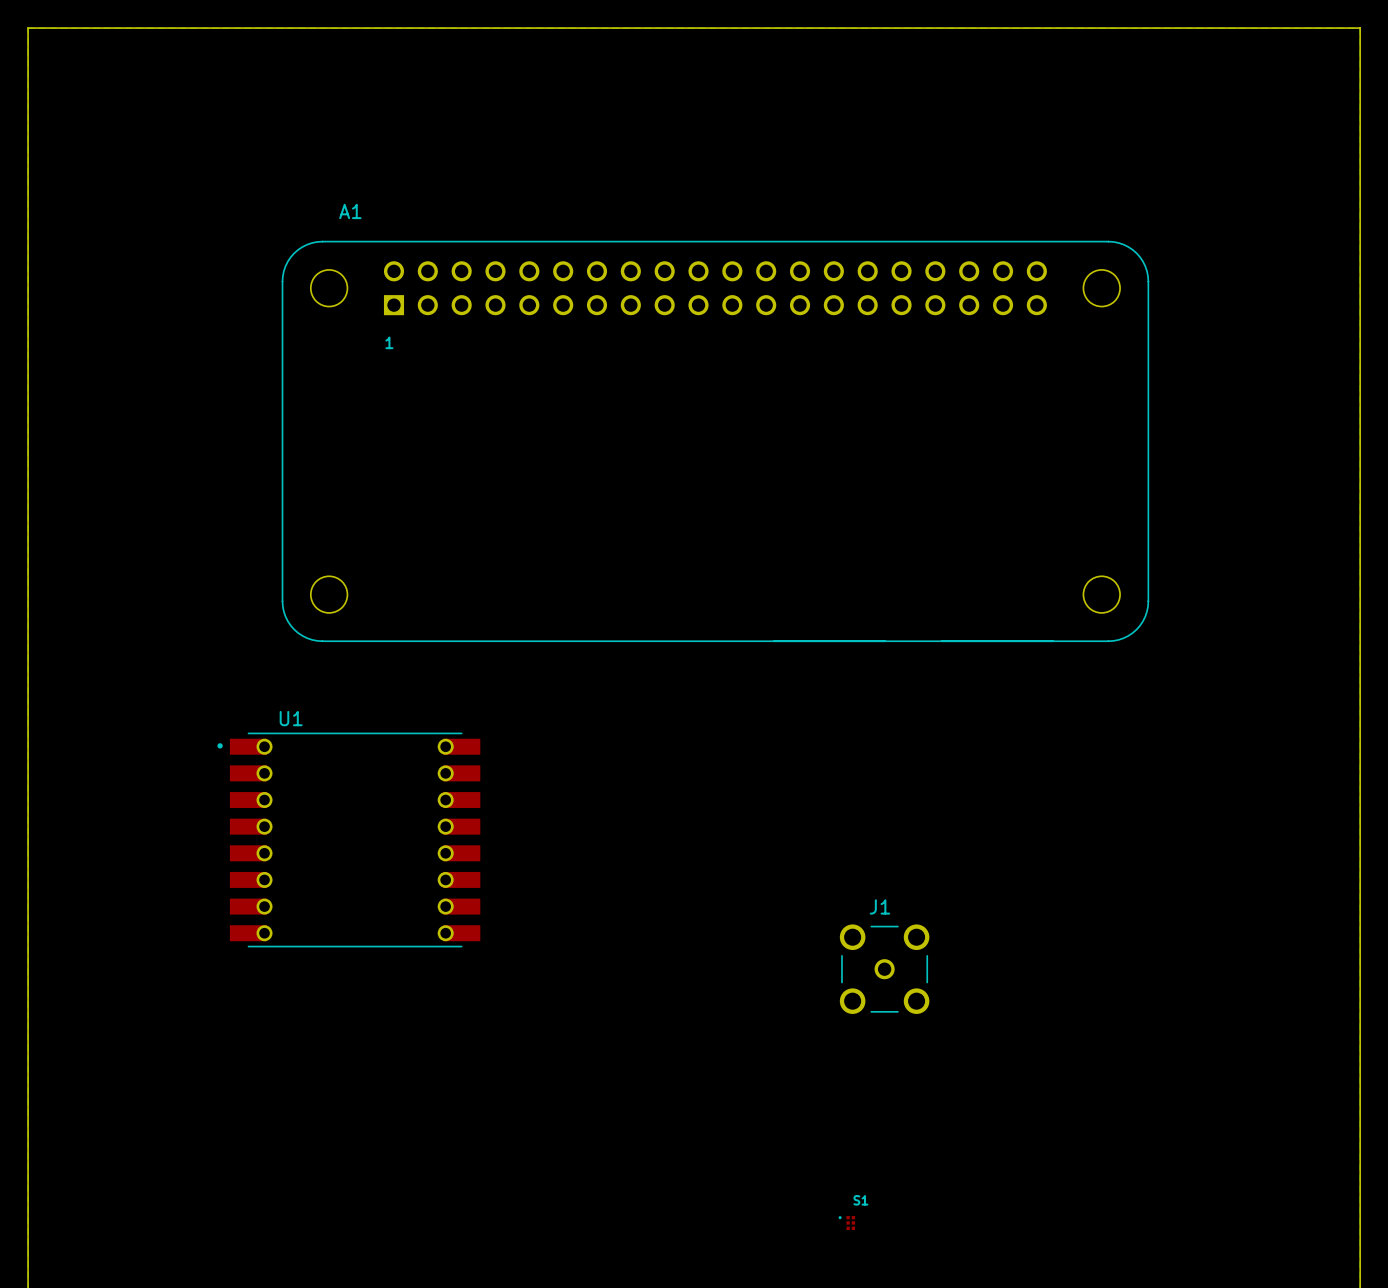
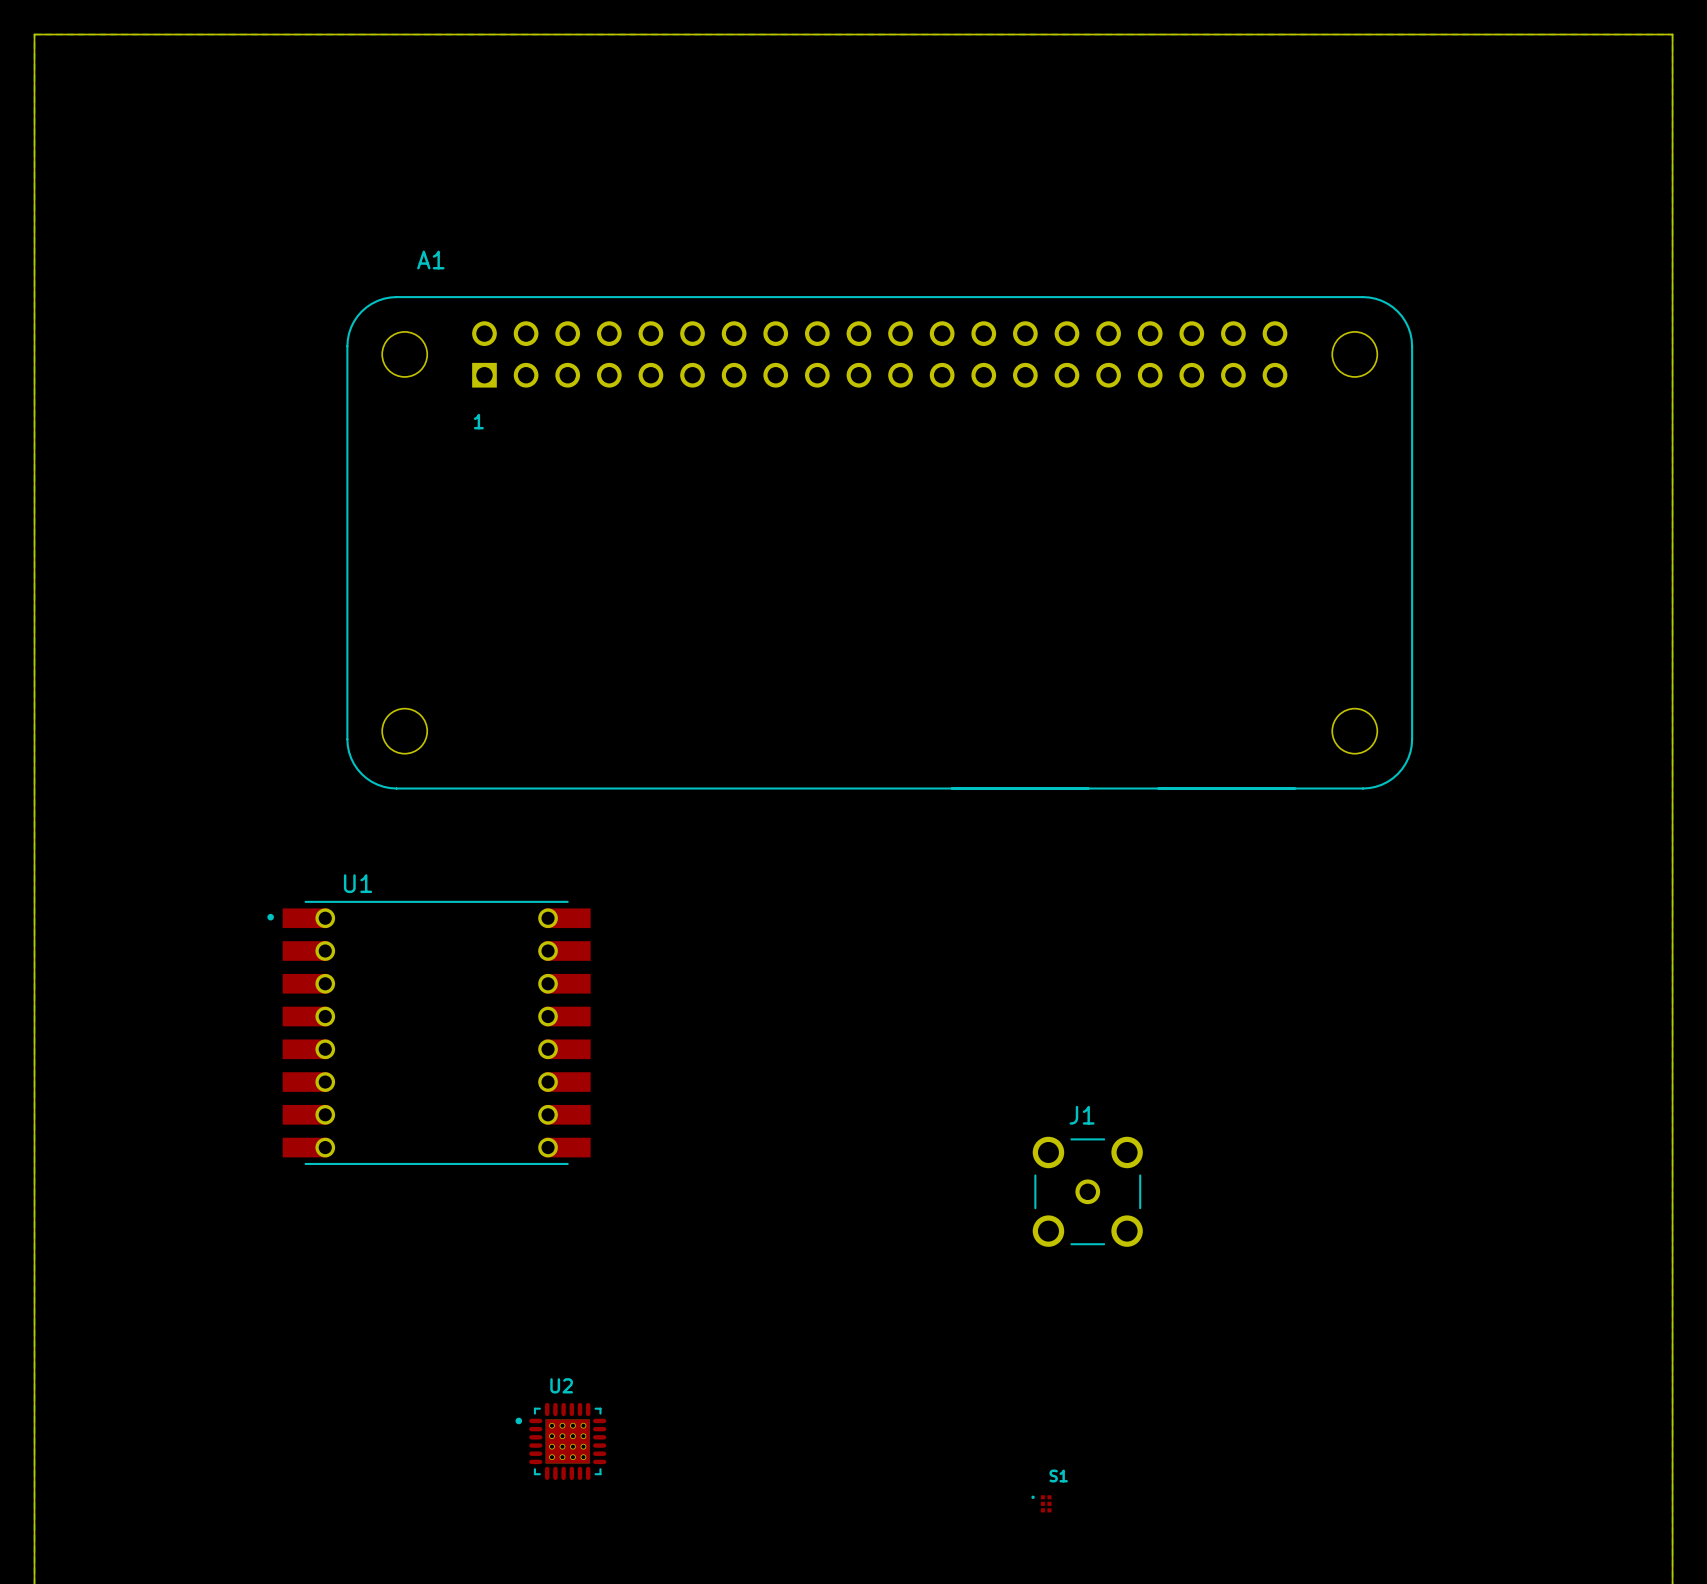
U2: none -> (560, 1441)

